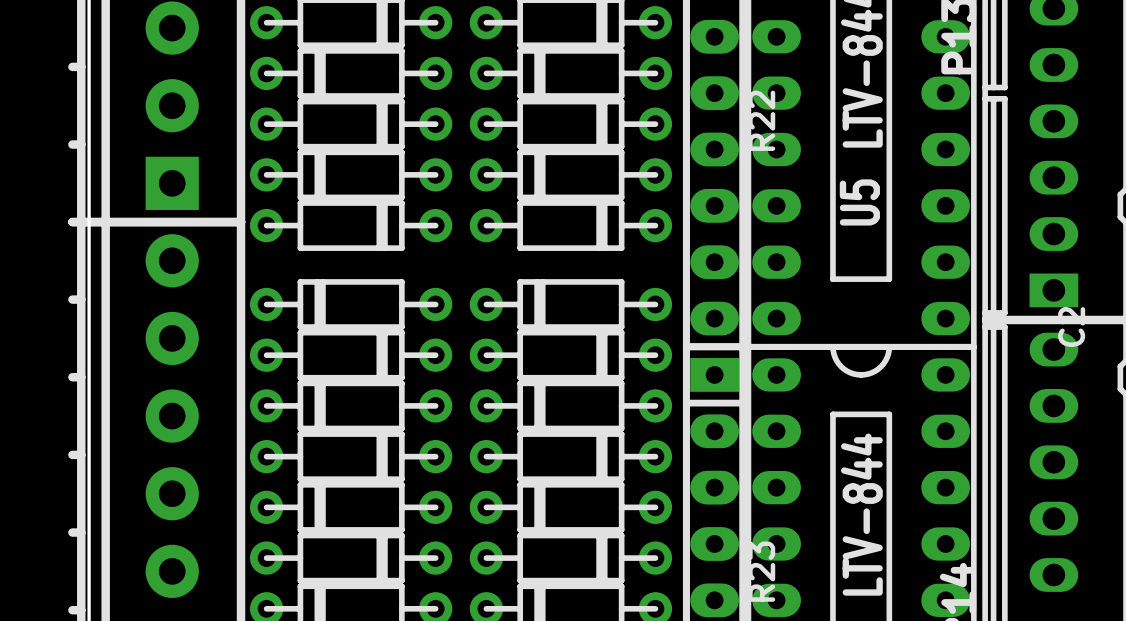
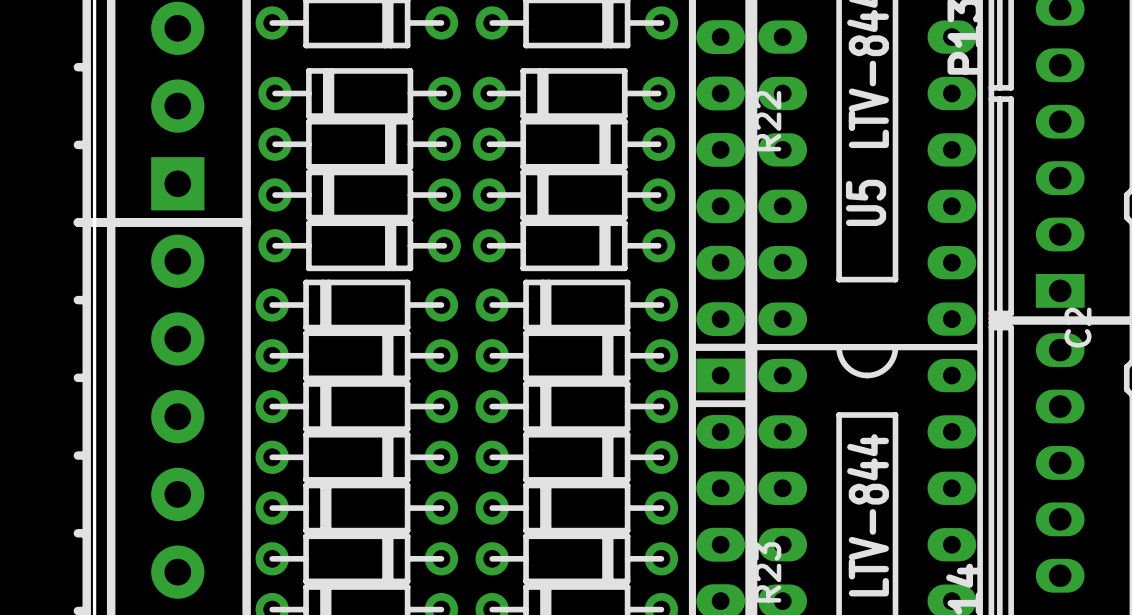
part: (351, 73) -> none
part: (570, 73) -> none
part: none -> (359, 93)
part: none -> (574, 93)
part: (351, 124) -> none
part: (570, 124) -> none
part: none -> (359, 144)
part: none -> (574, 144)
part: (351, 174) -> none
part: (570, 174) -> none
part: none -> (359, 195)
part: none -> (574, 195)
part: (351, 225) -> none
part: (570, 225) -> none
part: none -> (359, 245)
part: none -> (574, 245)

